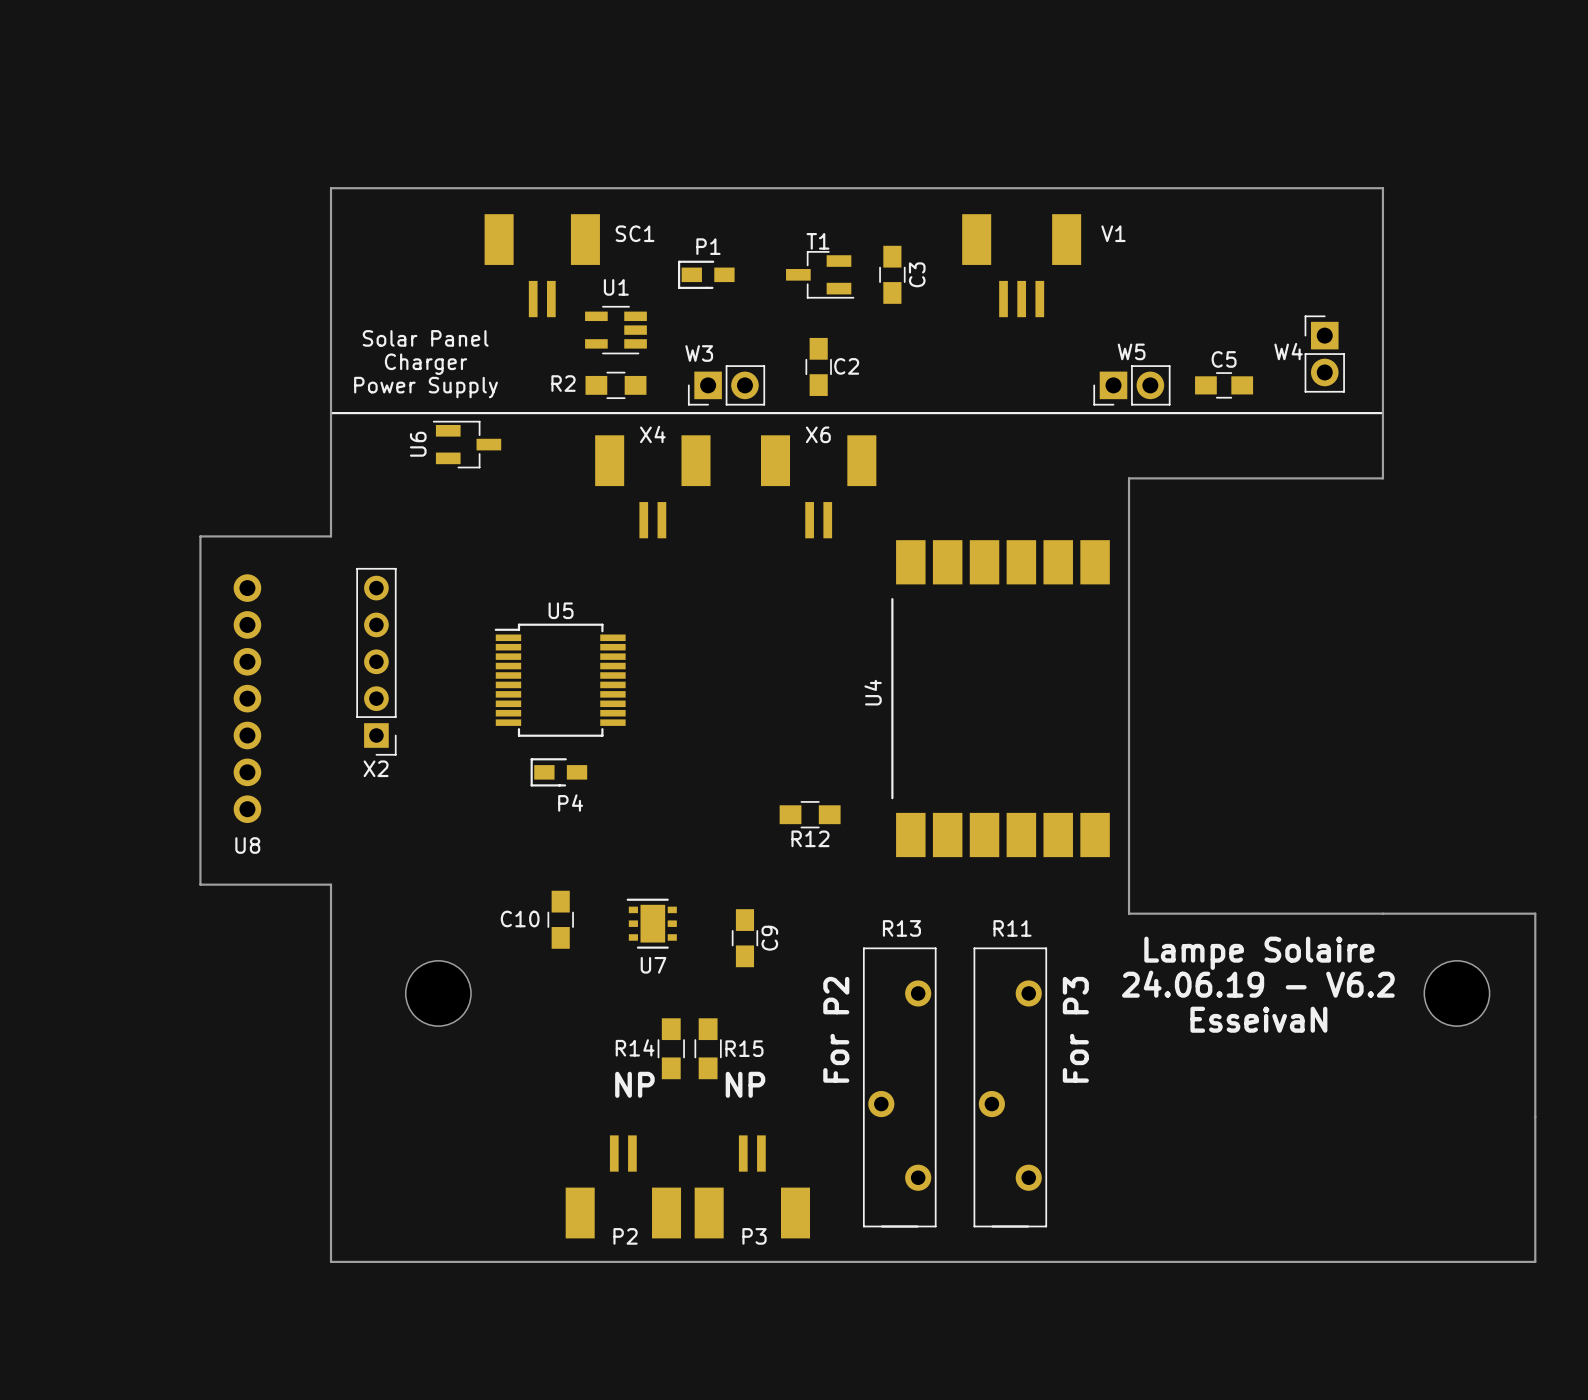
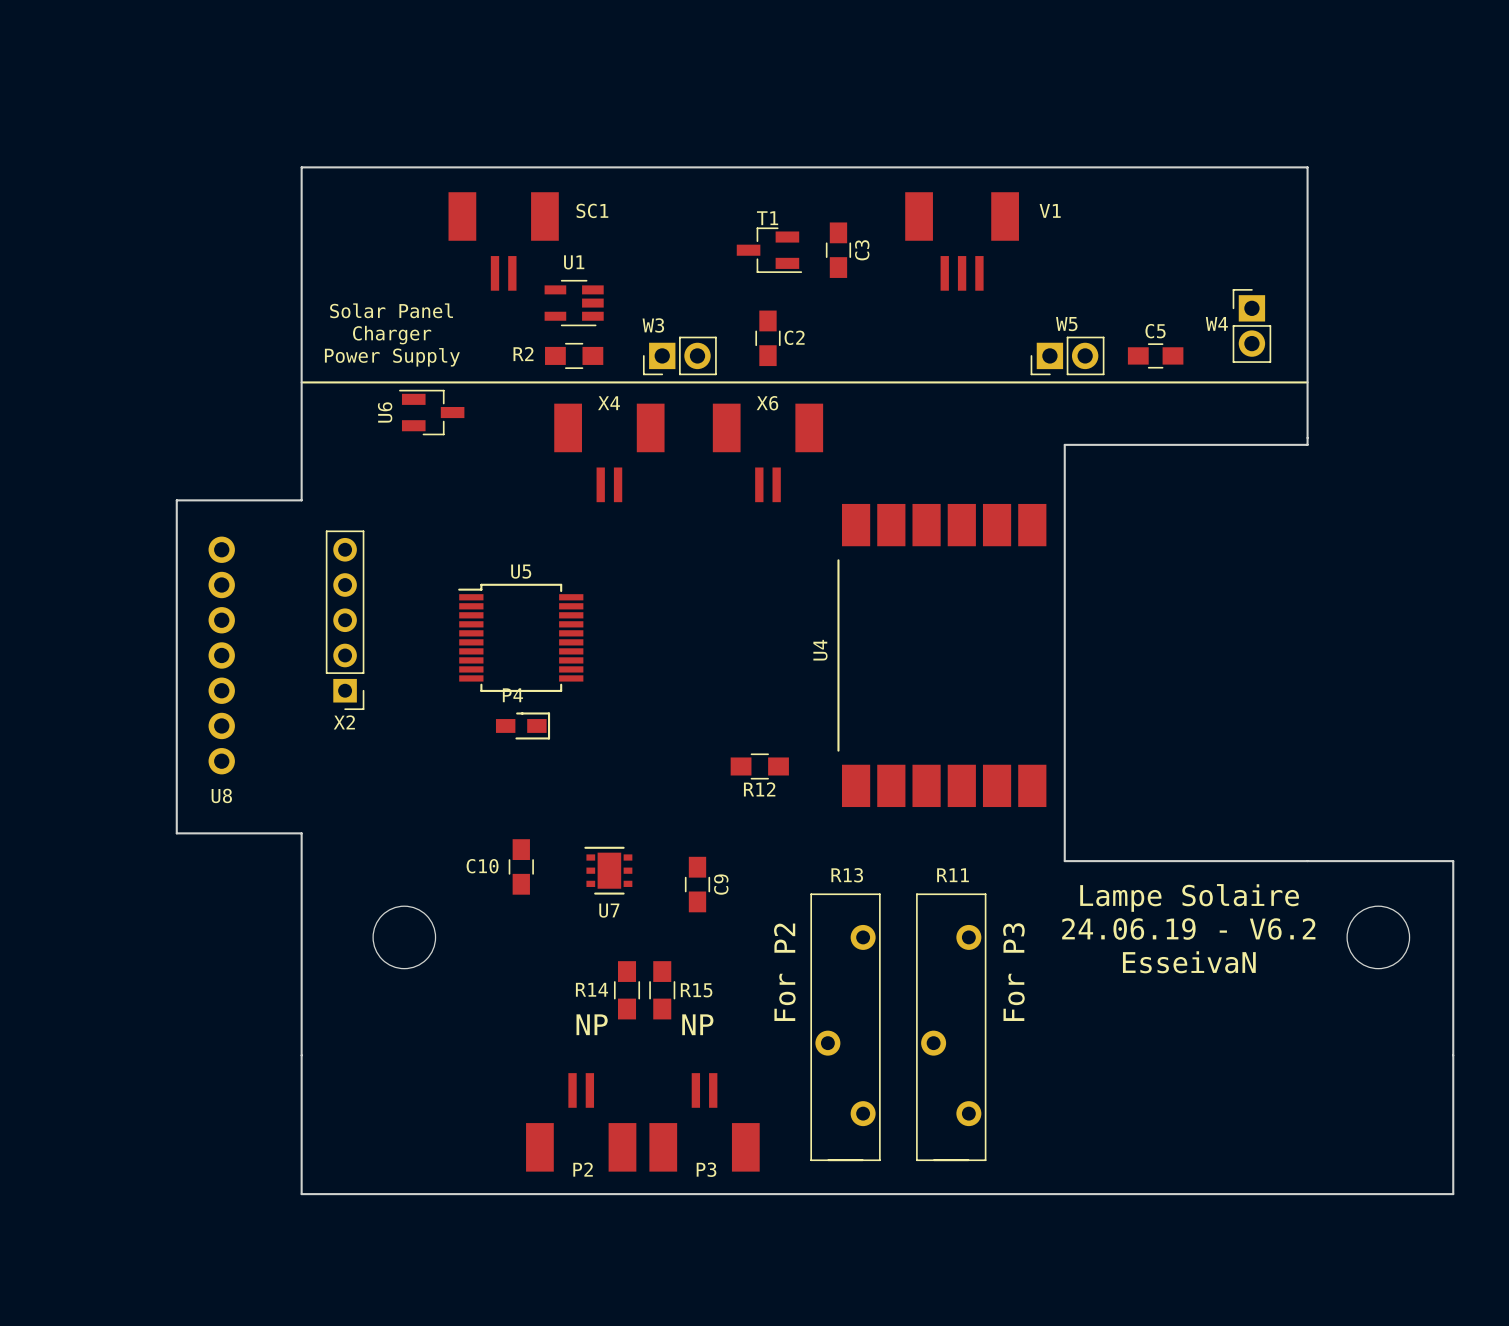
P1: (706, 274) -> none
P4 rotation: 0° (558, 772) -> 180° (523, 725)

